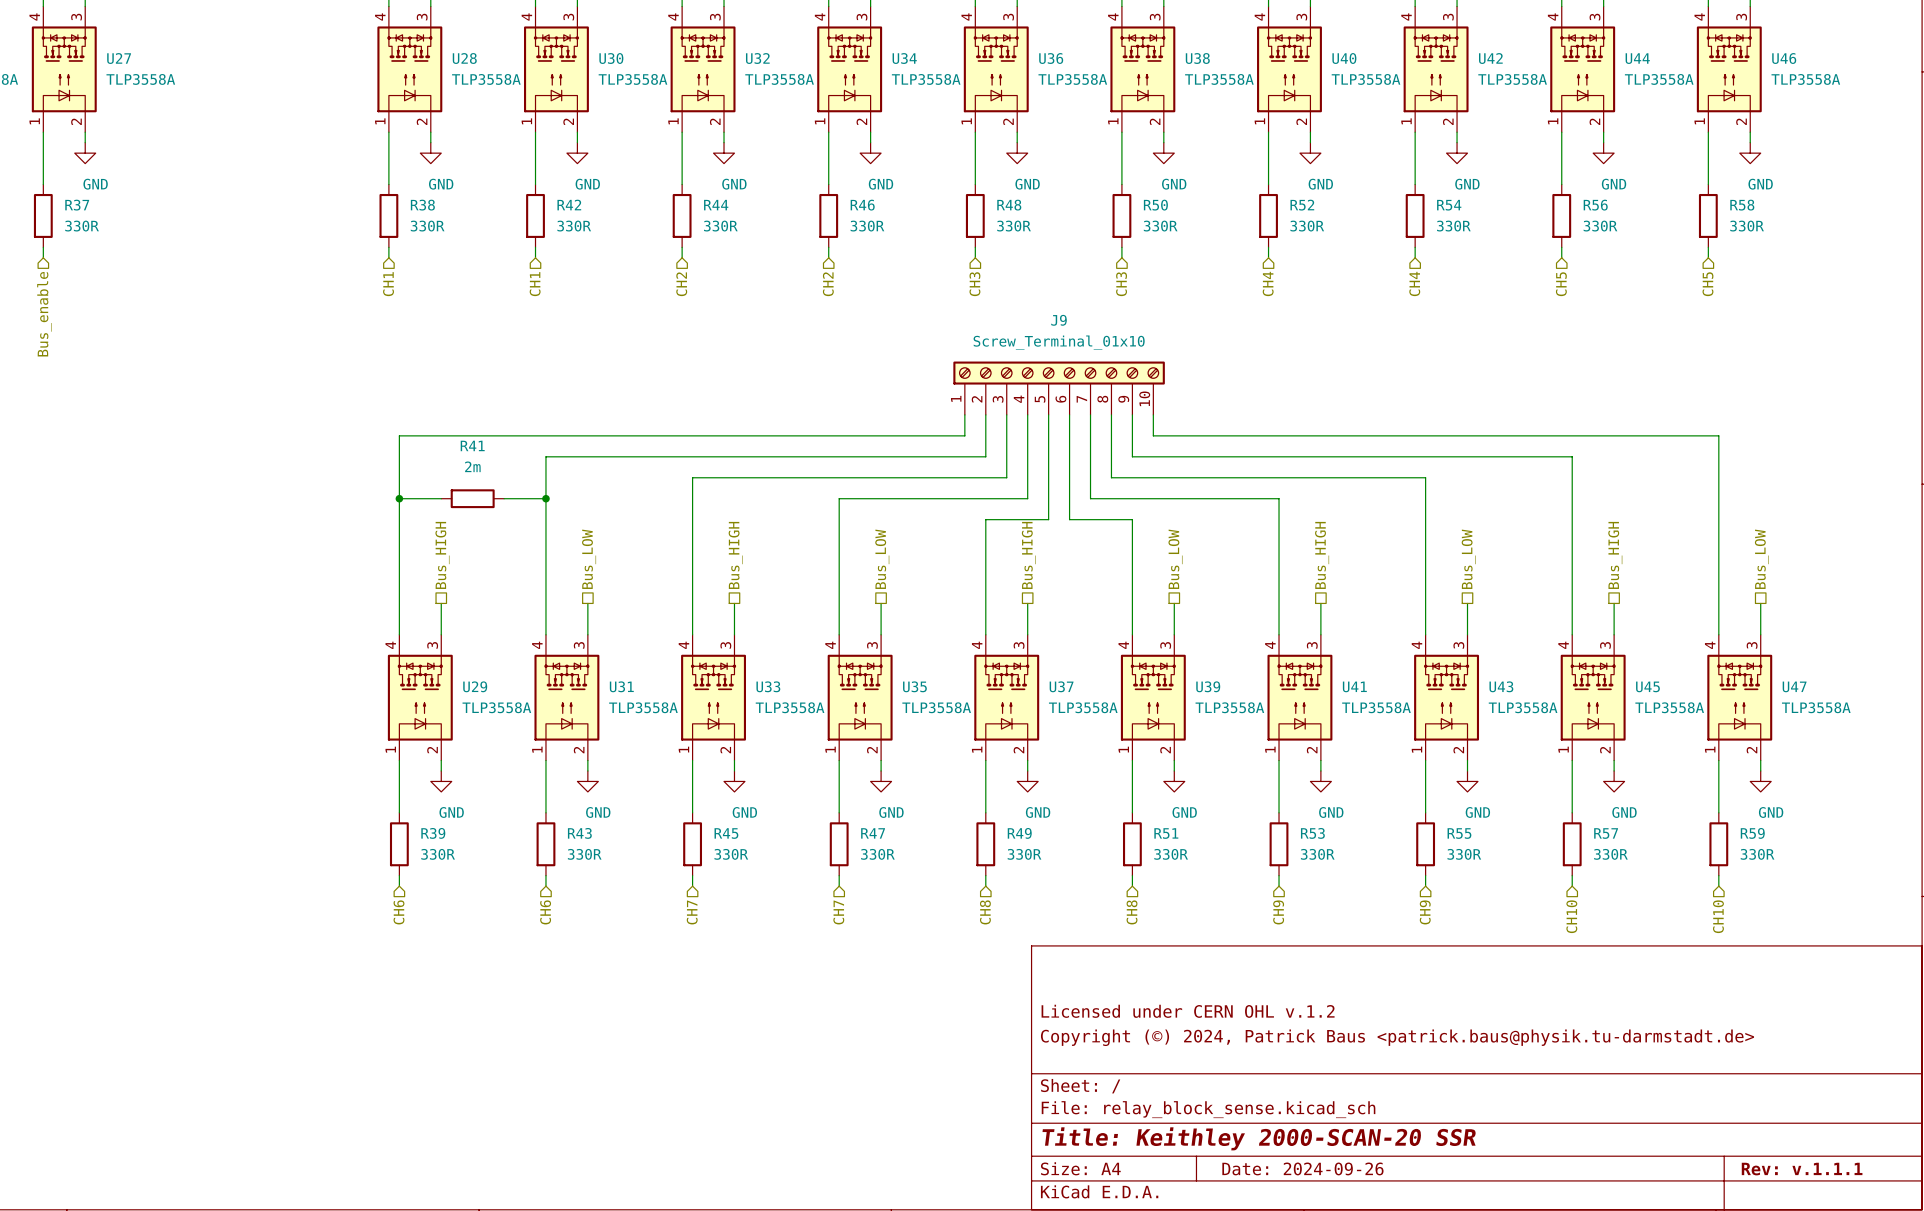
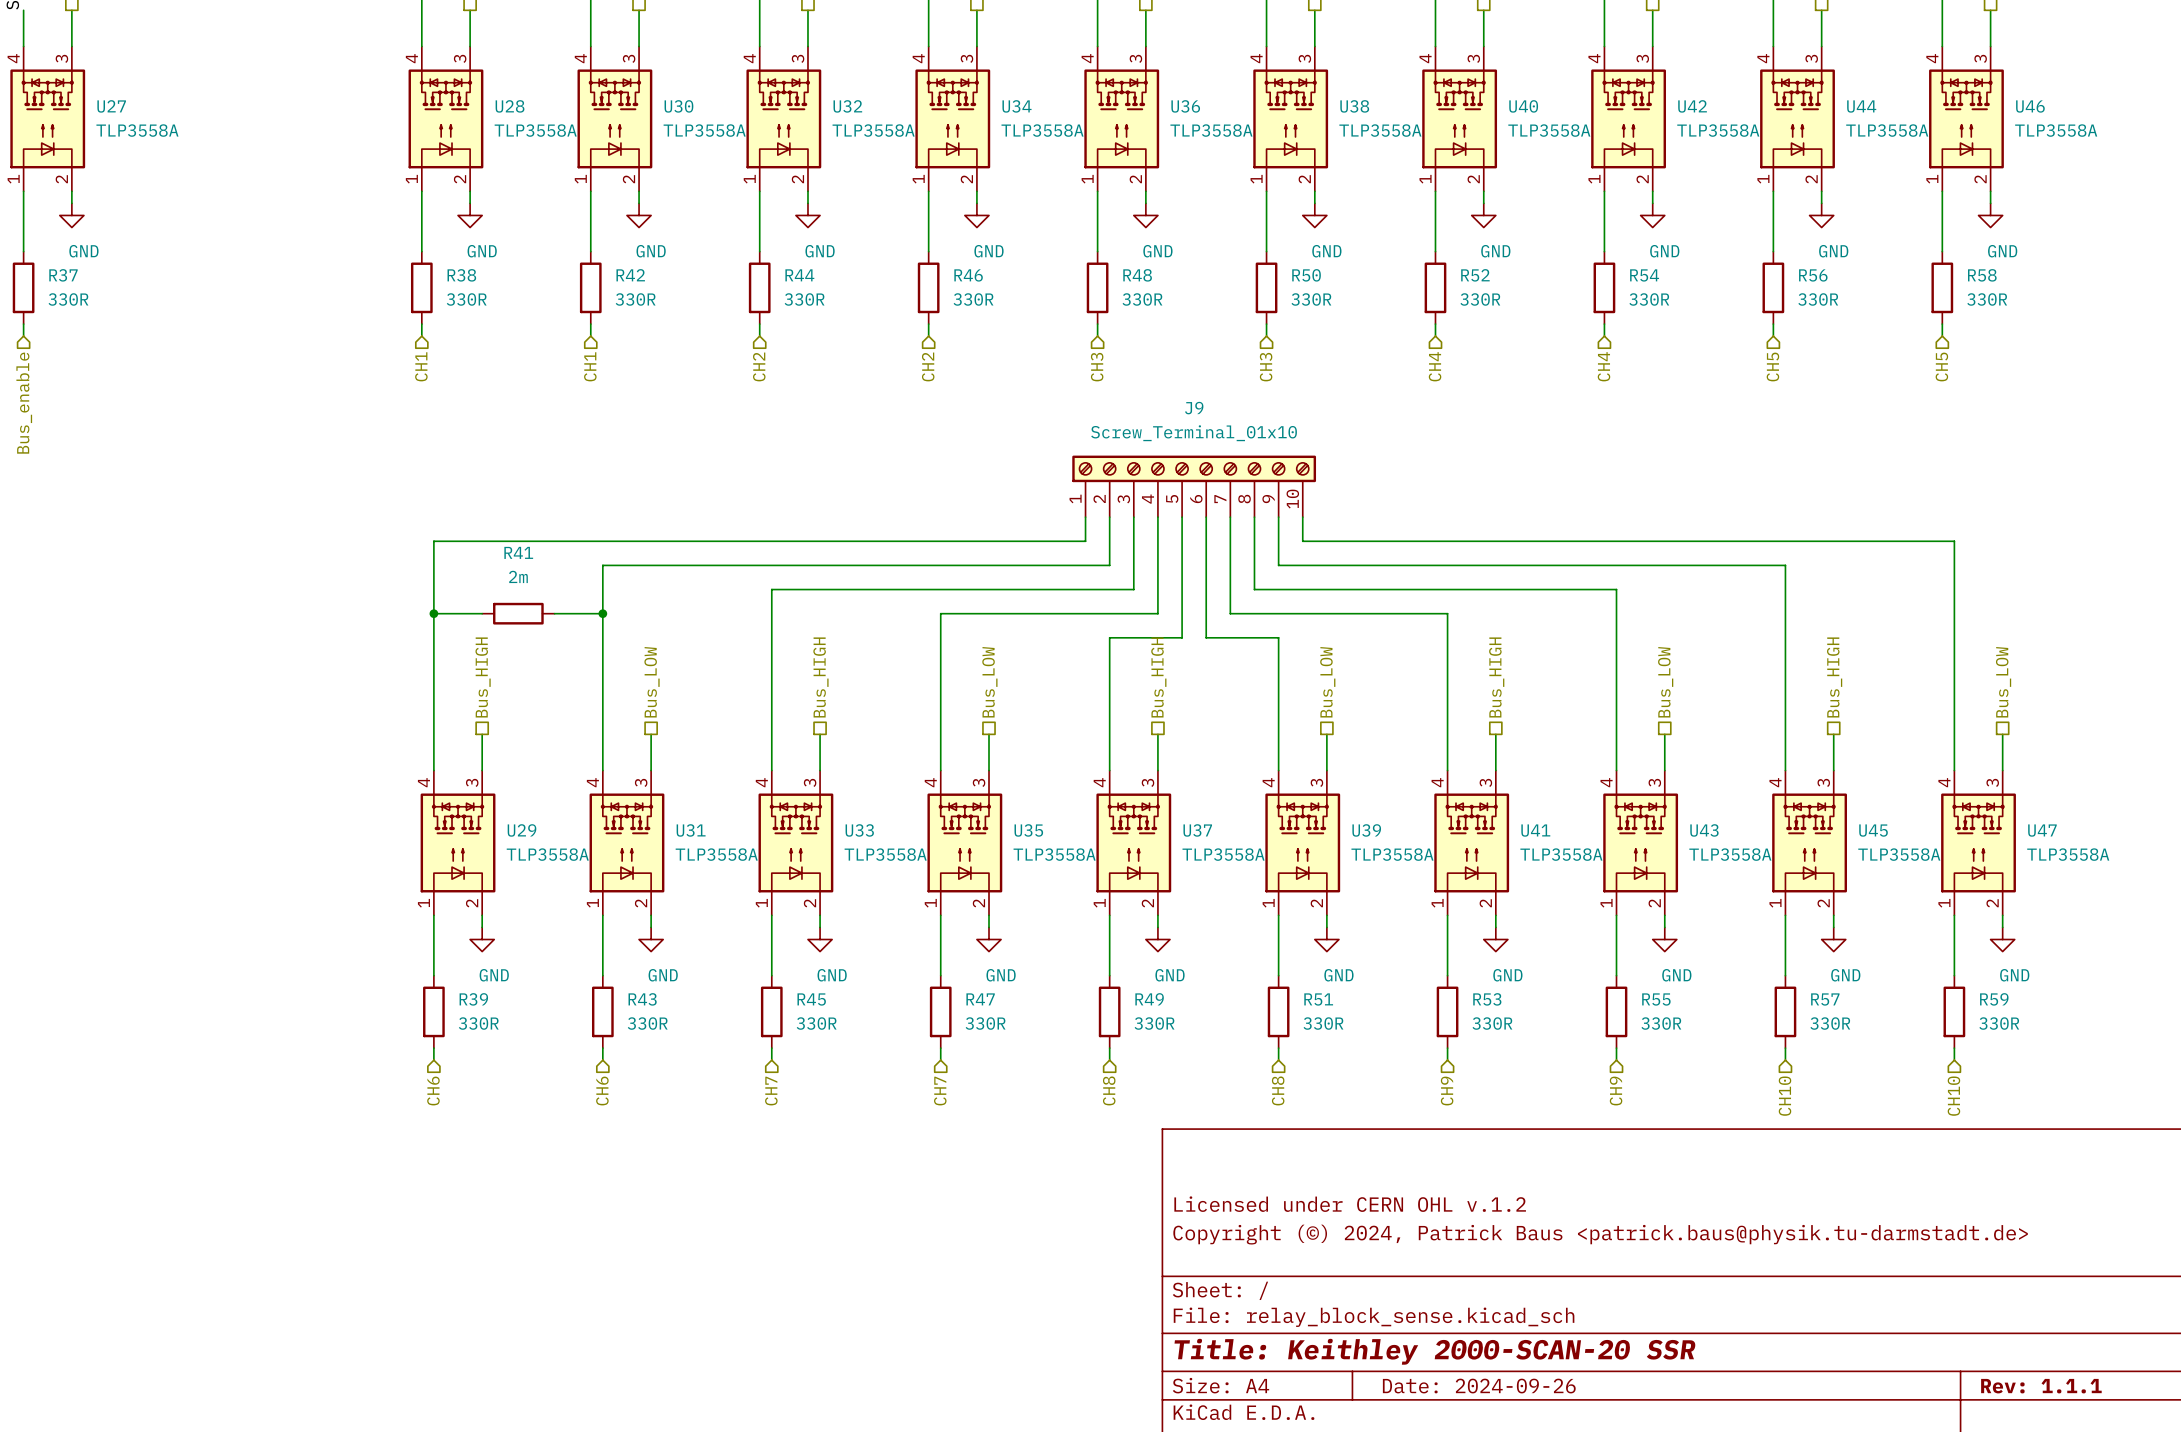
title block: Rev: v.1.1.1 (1802, 1169) -> Rev: 1.1.1 (2041, 1386)

